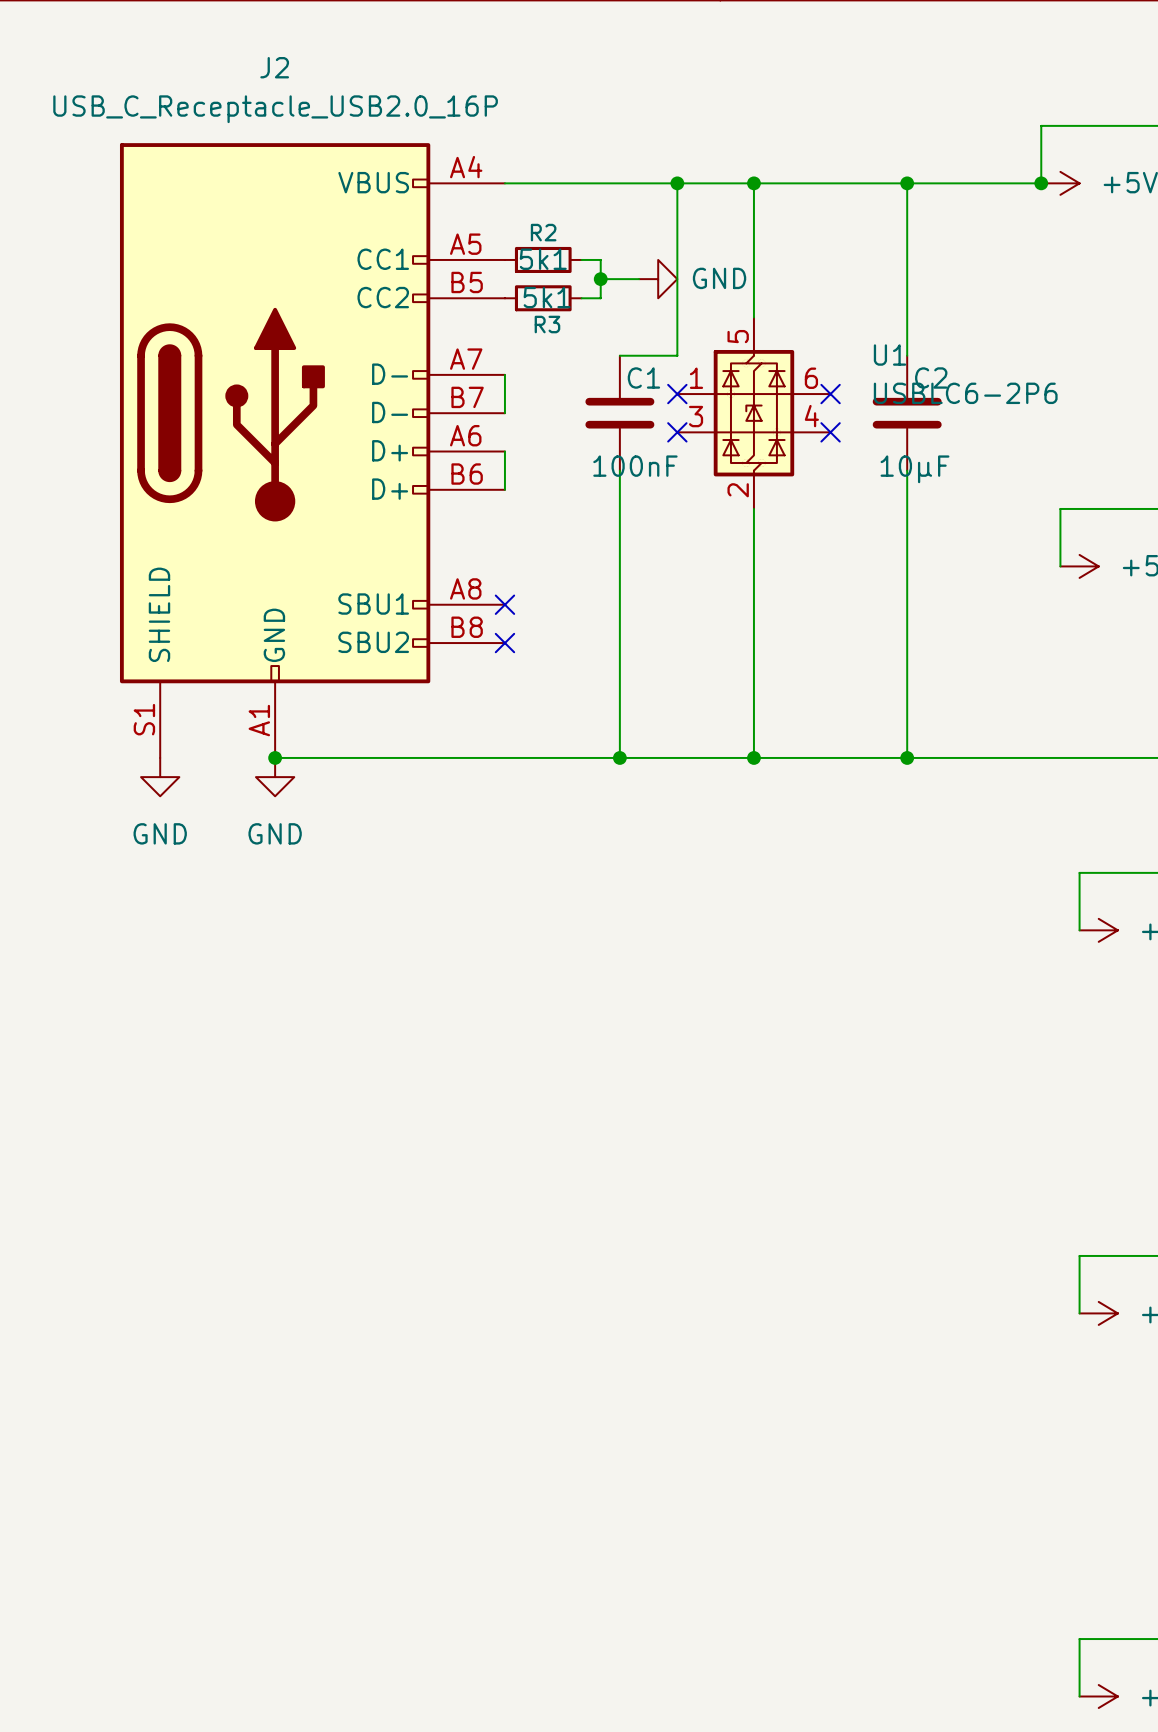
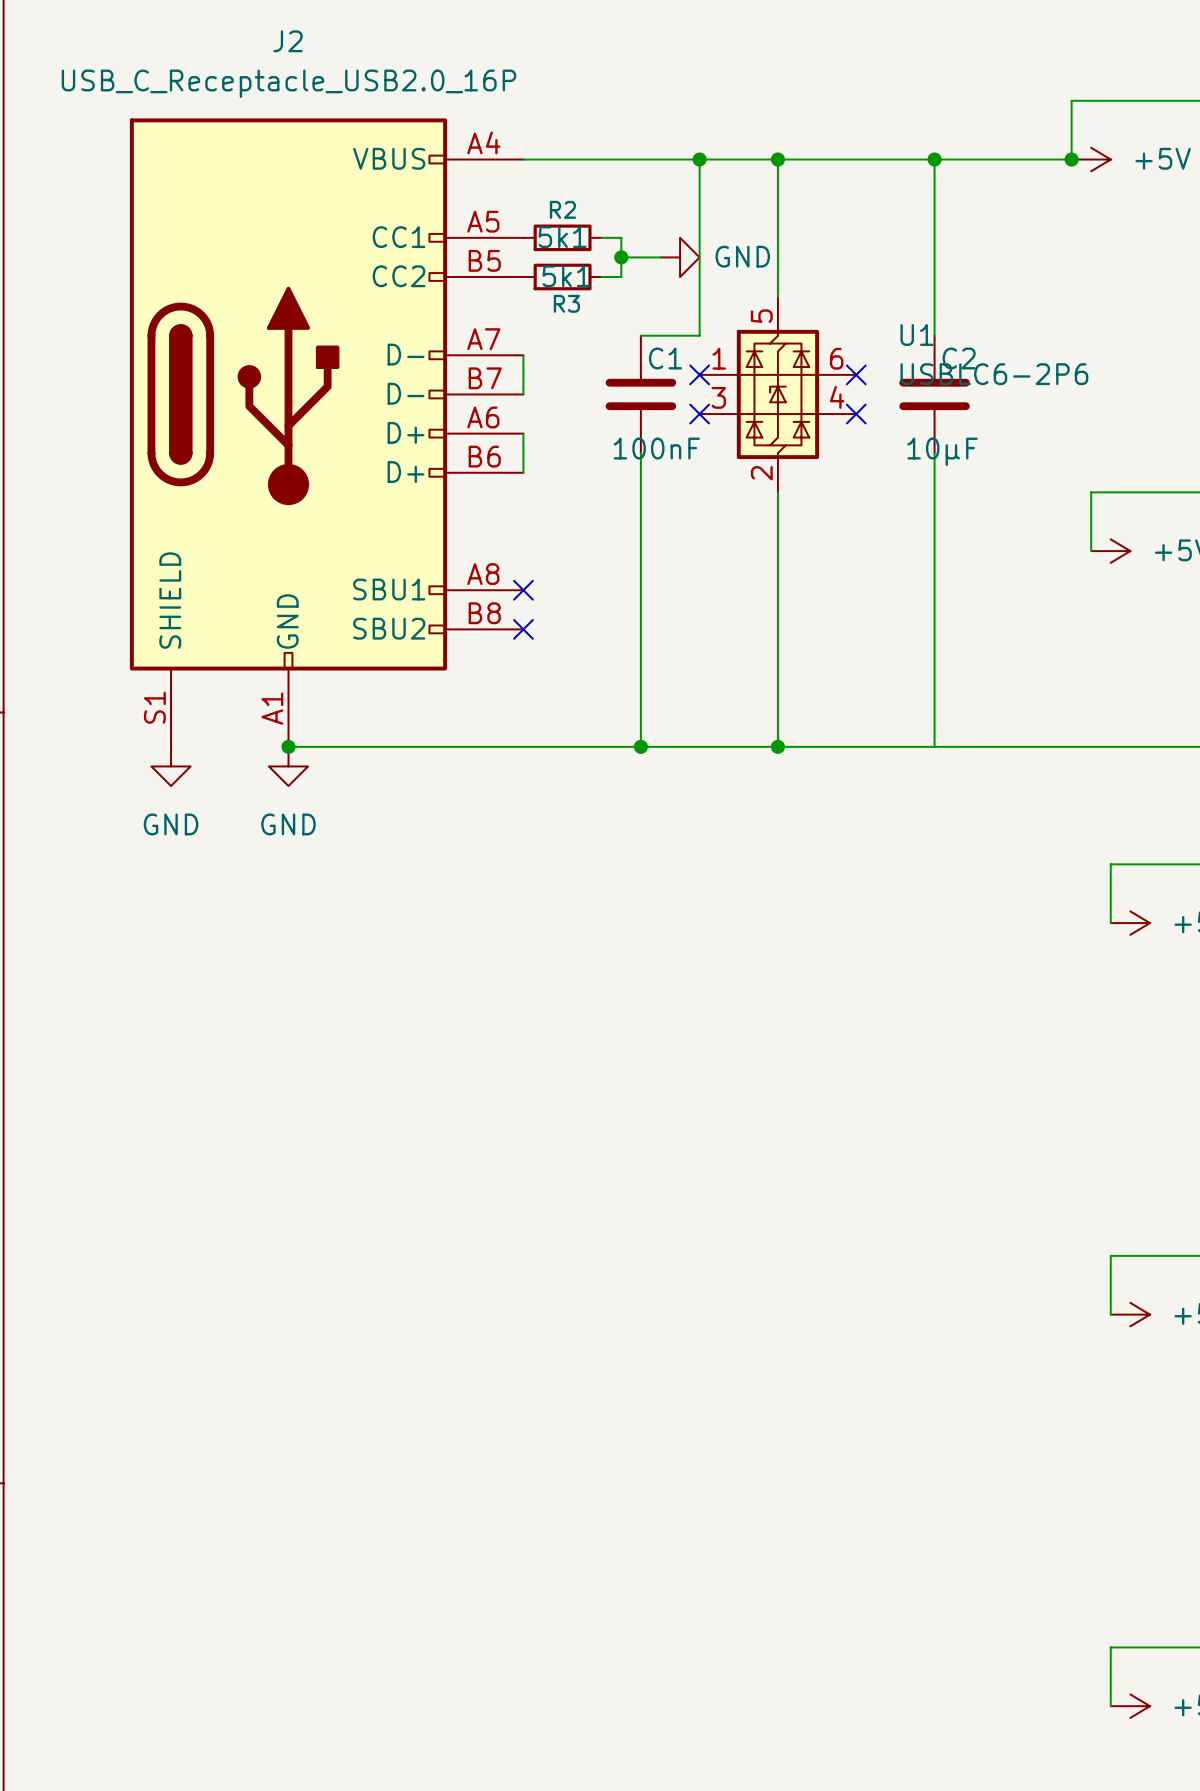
junction: (907, 757) -> none

